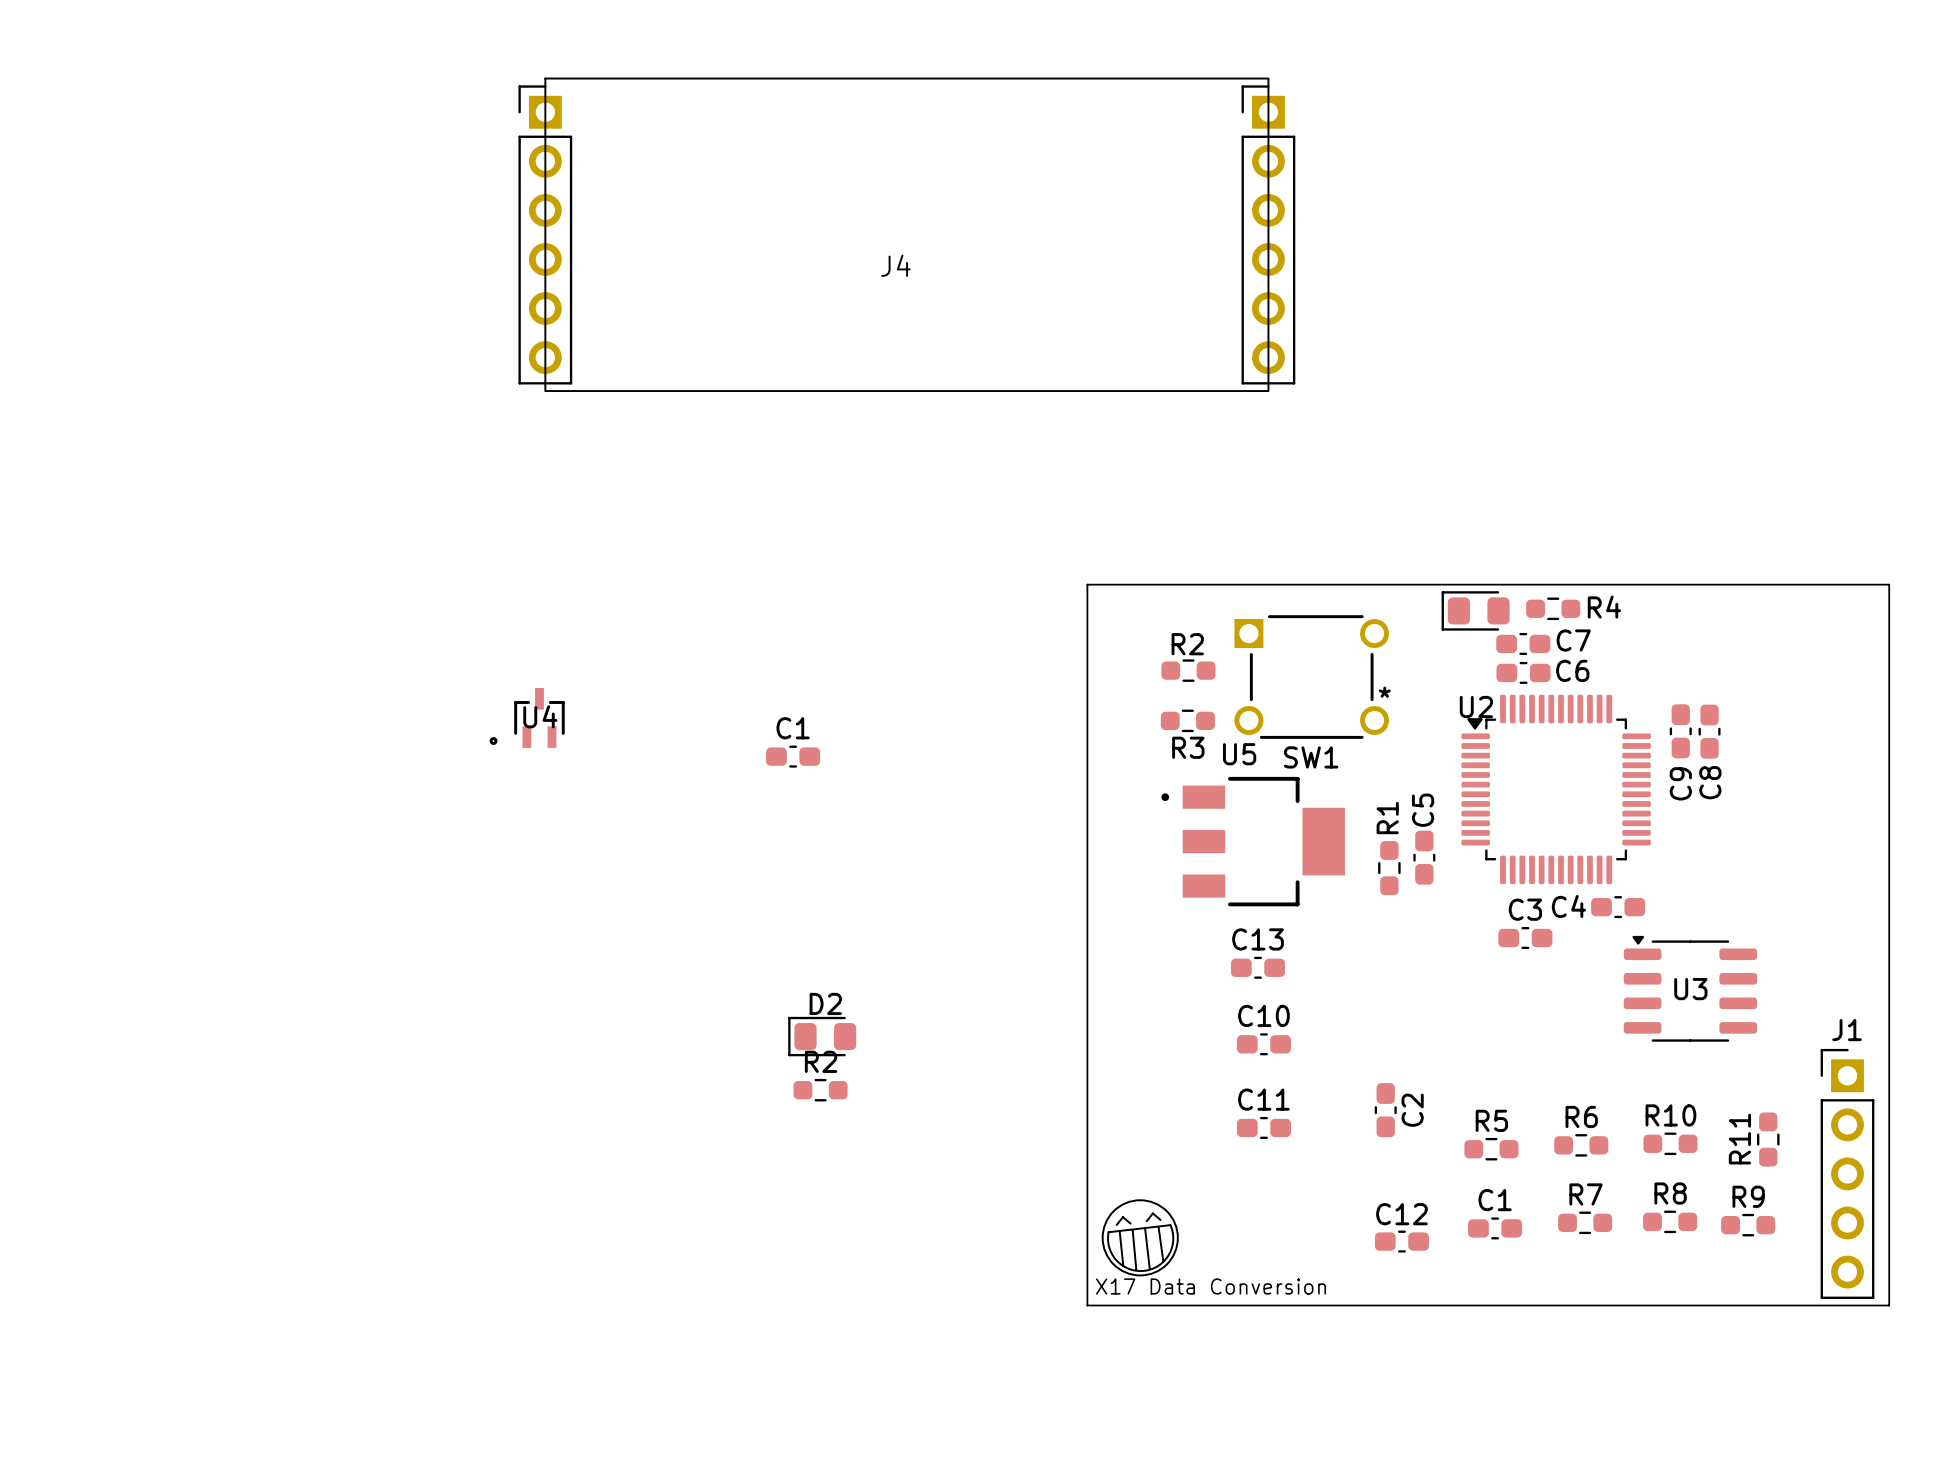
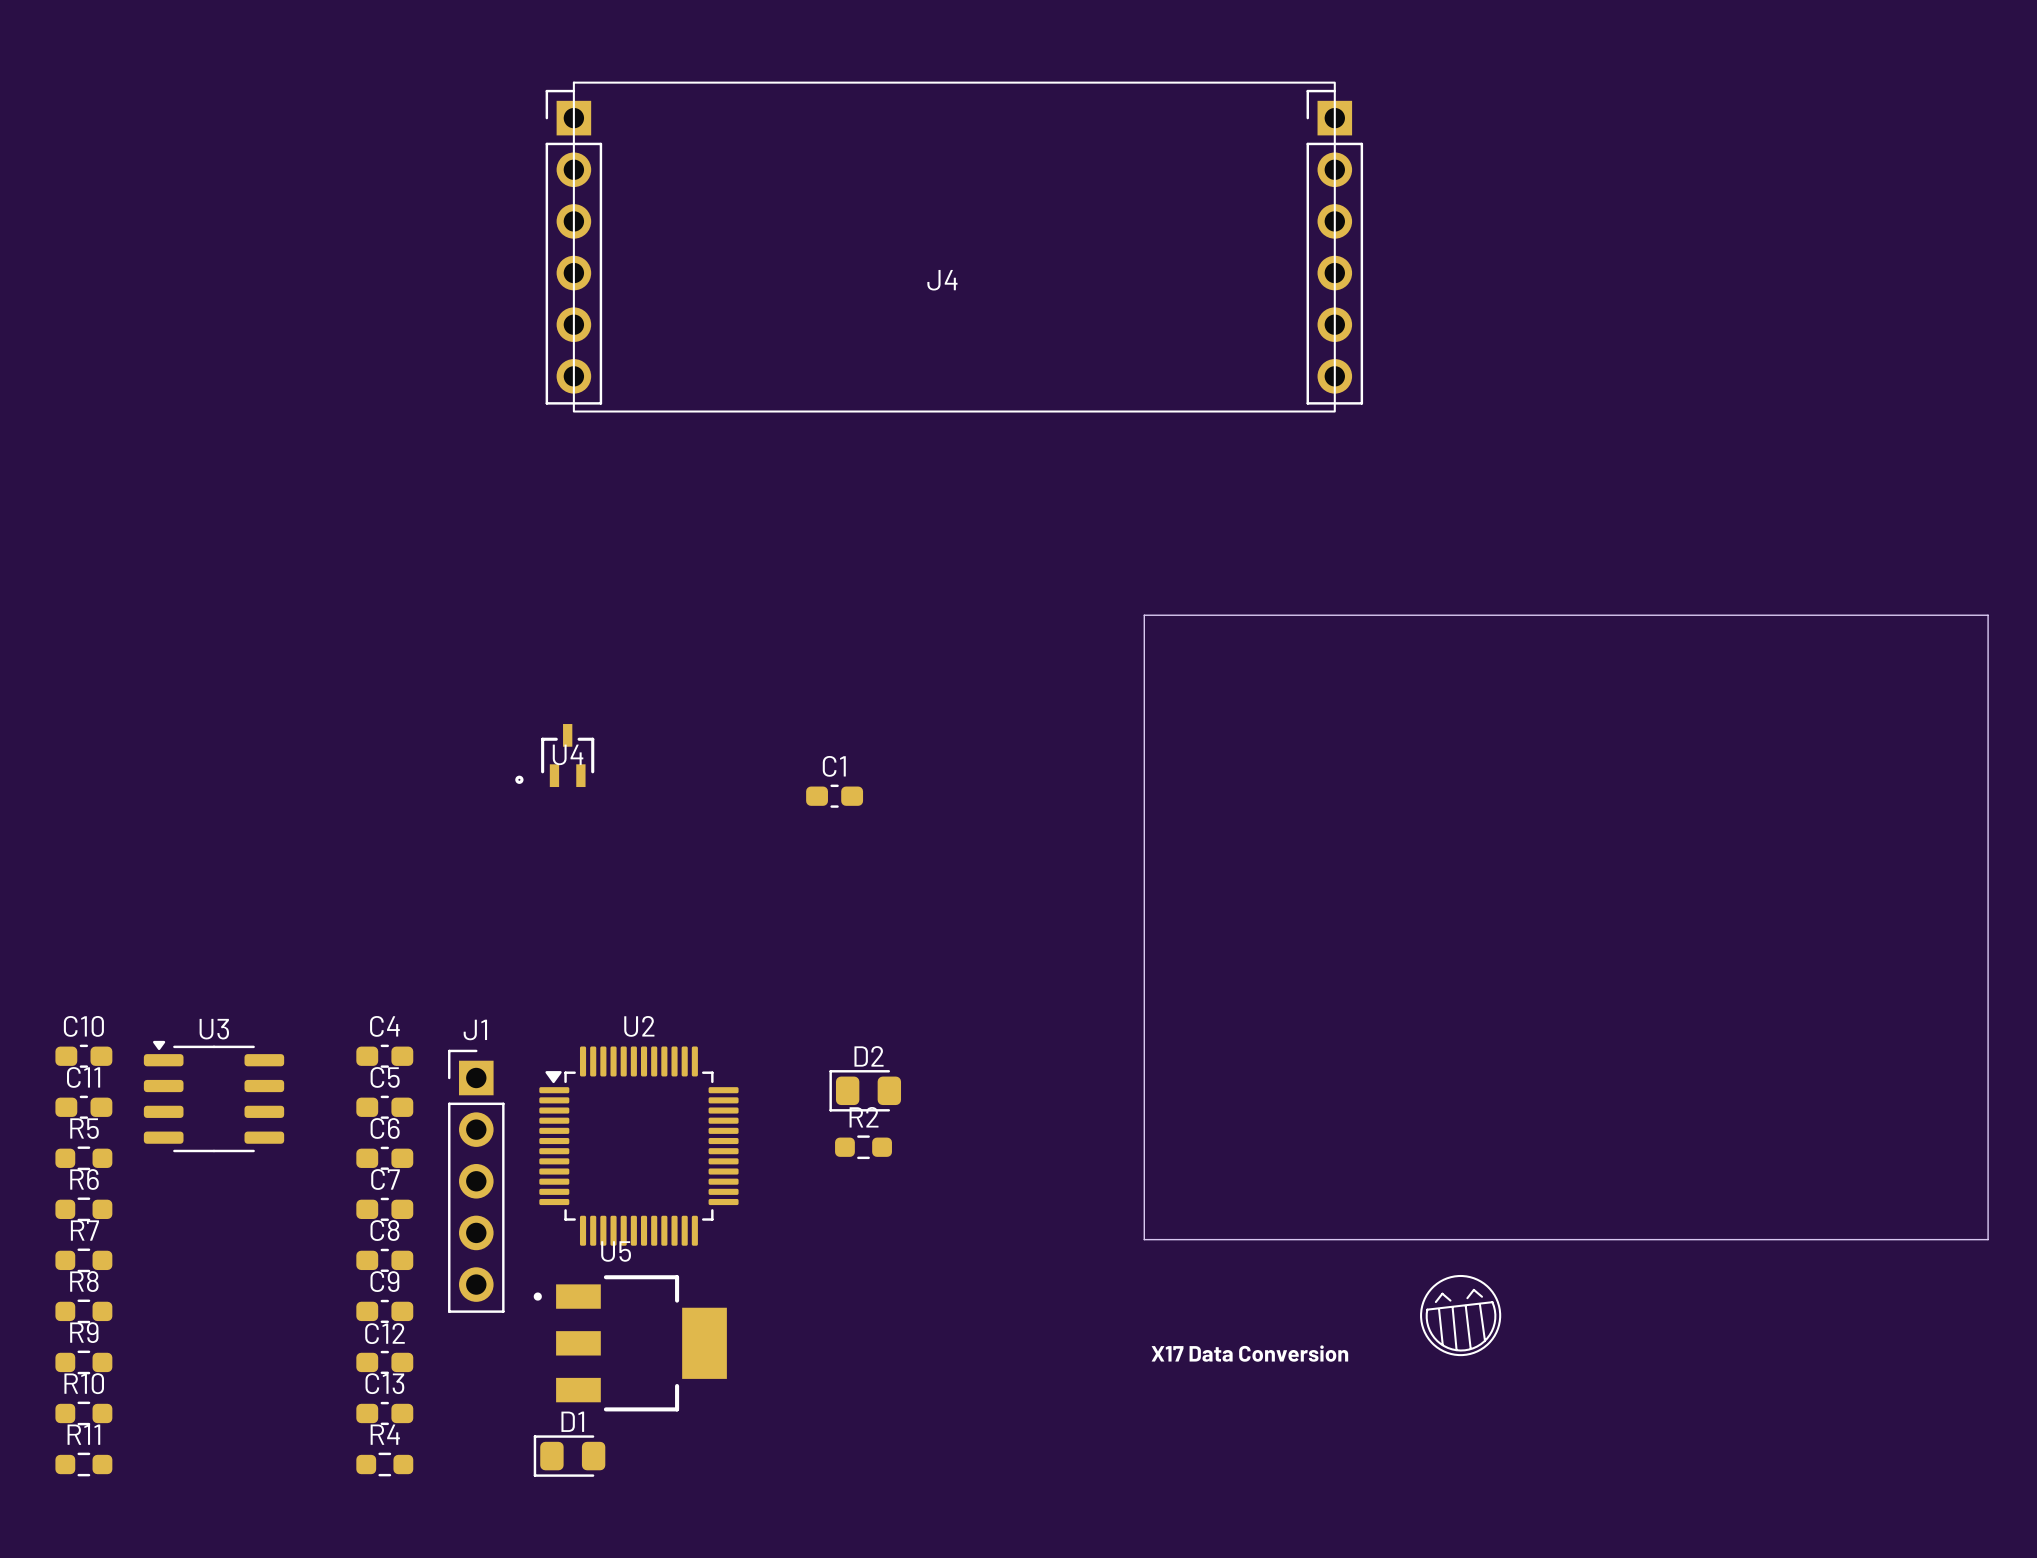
R4 name position: R4 (1604, 607) -> R4 (385, 1434)
R4 position: (1553, 608) -> (384, 1464)
part: (1475, 610) -> none
C7 name position: C7 (1573, 640) -> C7 (385, 1179)
C7 position: (1523, 643) -> (384, 1209)
R2: (1188, 670) -> none
C6 name position: C6 (1572, 670) -> C6 (385, 1128)
C6 position: (1523, 672) -> (384, 1158)
SW1: (1311, 677) -> none
U2 name position: U2 (1476, 707) -> U2 (639, 1026)
R3: (1187, 720) -> none
C9 rotation: 0° (1680, 731) -> 90° clockwise (384, 1311)
C9 position: (1680, 731) -> (384, 1311)
C8 rotation: 0° (1709, 731) -> 90° clockwise (384, 1260)
C8 position: (1709, 731) -> (384, 1260)
C8 name position: C8 (1710, 782) -> C8 (384, 1230)
C9 name position: C9 (1680, 783) -> C9 (384, 1281)
U2 position: (1556, 789) -> (638, 1146)
U5 position: (1253, 841) -> (630, 1343)
C5 rotation: 0° (1424, 857) -> 90° clockwise (384, 1107)
C5 position: (1424, 857) -> (384, 1107)
R1: (1389, 868) -> none
C4 name position: C4 (1568, 906) -> C4 (384, 1026)
C4 position: (1618, 907) -> (384, 1056)
C3: (1525, 938) -> none
C13 position: (1258, 967) -> (384, 1413)
U3 position: (1690, 988) -> (214, 1096)
U3 name position: U3 (1690, 989) -> U3 (214, 1029)
C10 position: (1263, 1044) -> (83, 1056)
C2: (1385, 1110) -> none
C11 position: (1263, 1127) -> (83, 1107)
R11 rotation: 0° (1768, 1139) -> 90° clockwise (83, 1464)
R11 position: (1768, 1139) -> (83, 1464)
R10 position: (1670, 1143) -> (83, 1413)
R6 position: (1581, 1145) -> (83, 1209)
R5 position: (1491, 1149) -> (83, 1158)
J1 position: (1847, 1173) -> (476, 1181)
board edge: (1087, 1177) (1087, 1305) (1889, 1305) (1889, 1177) -> (1144, 1239) (1988, 1239)
line: (1160, 1219) (1152, 1213) (1146, 1221) -> (1482, 1296) (1473, 1289) (1467, 1298)
R8 position: (1670, 1221) -> (83, 1311)
R7 position: (1585, 1222) -> (83, 1260)
line: (1130, 1223) (1122, 1217) (1116, 1225) -> (1450, 1300) (1442, 1293) (1435, 1302)
line: (1170, 1225) (1108, 1232) (1108, 1240) (1111, 1252) (1118, 1262) (1132, 1269) (1144, 1270) (1155, 1267) (1165, 1259) (1171, 1249) (1173, 1236) (1170, 1225) -> (1492, 1302) (1427, 1309) (1427, 1322) (1429, 1330) (1437, 1341) (1448, 1348) (1460, 1350) (1473, 1348) (1484, 1341) (1491, 1331) (1495, 1318) (1492, 1302)
R9 position: (1748, 1225) -> (83, 1362)
line: (1158, 1226) (1163, 1261) -> (1479, 1304) (1484, 1340)
line: (1145, 1228) (1149, 1268) -> (1465, 1305) (1470, 1348)
C1: (1495, 1228) -> none
line: (1132, 1230) (1136, 1269) -> (1452, 1307) (1456, 1349)
line: (1119, 1231) (1123, 1265) -> (1439, 1308) (1442, 1345)
drawing position: (1140, 1237) -> (1460, 1315)
C12 position: (1401, 1241) -> (384, 1362)
D1: none -> (569, 1456)

